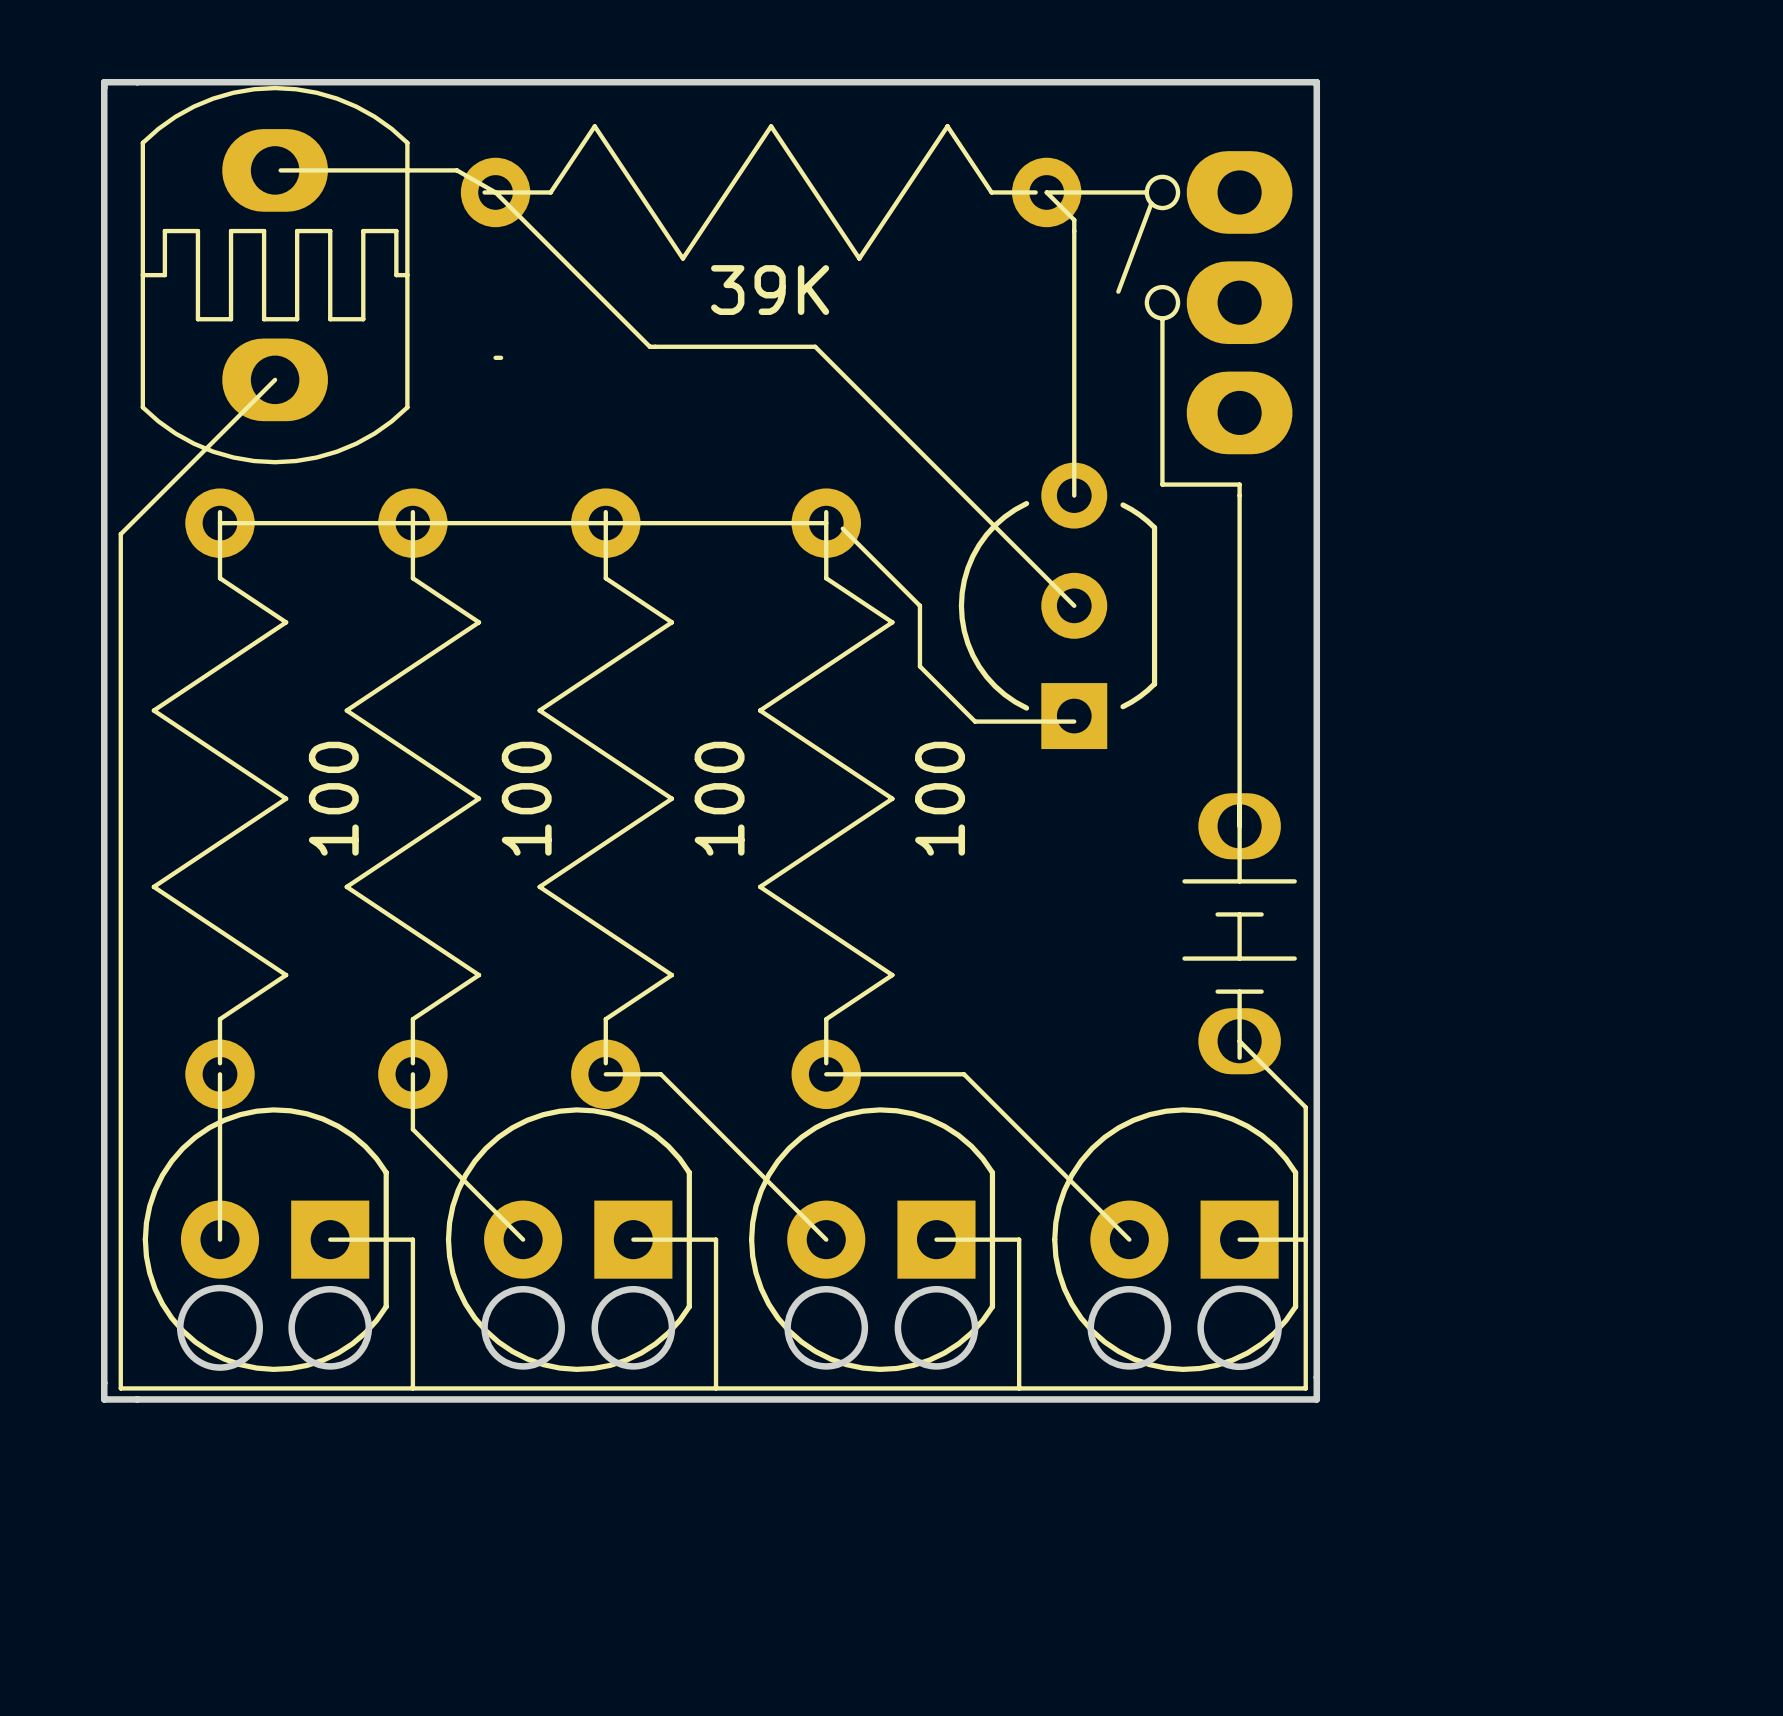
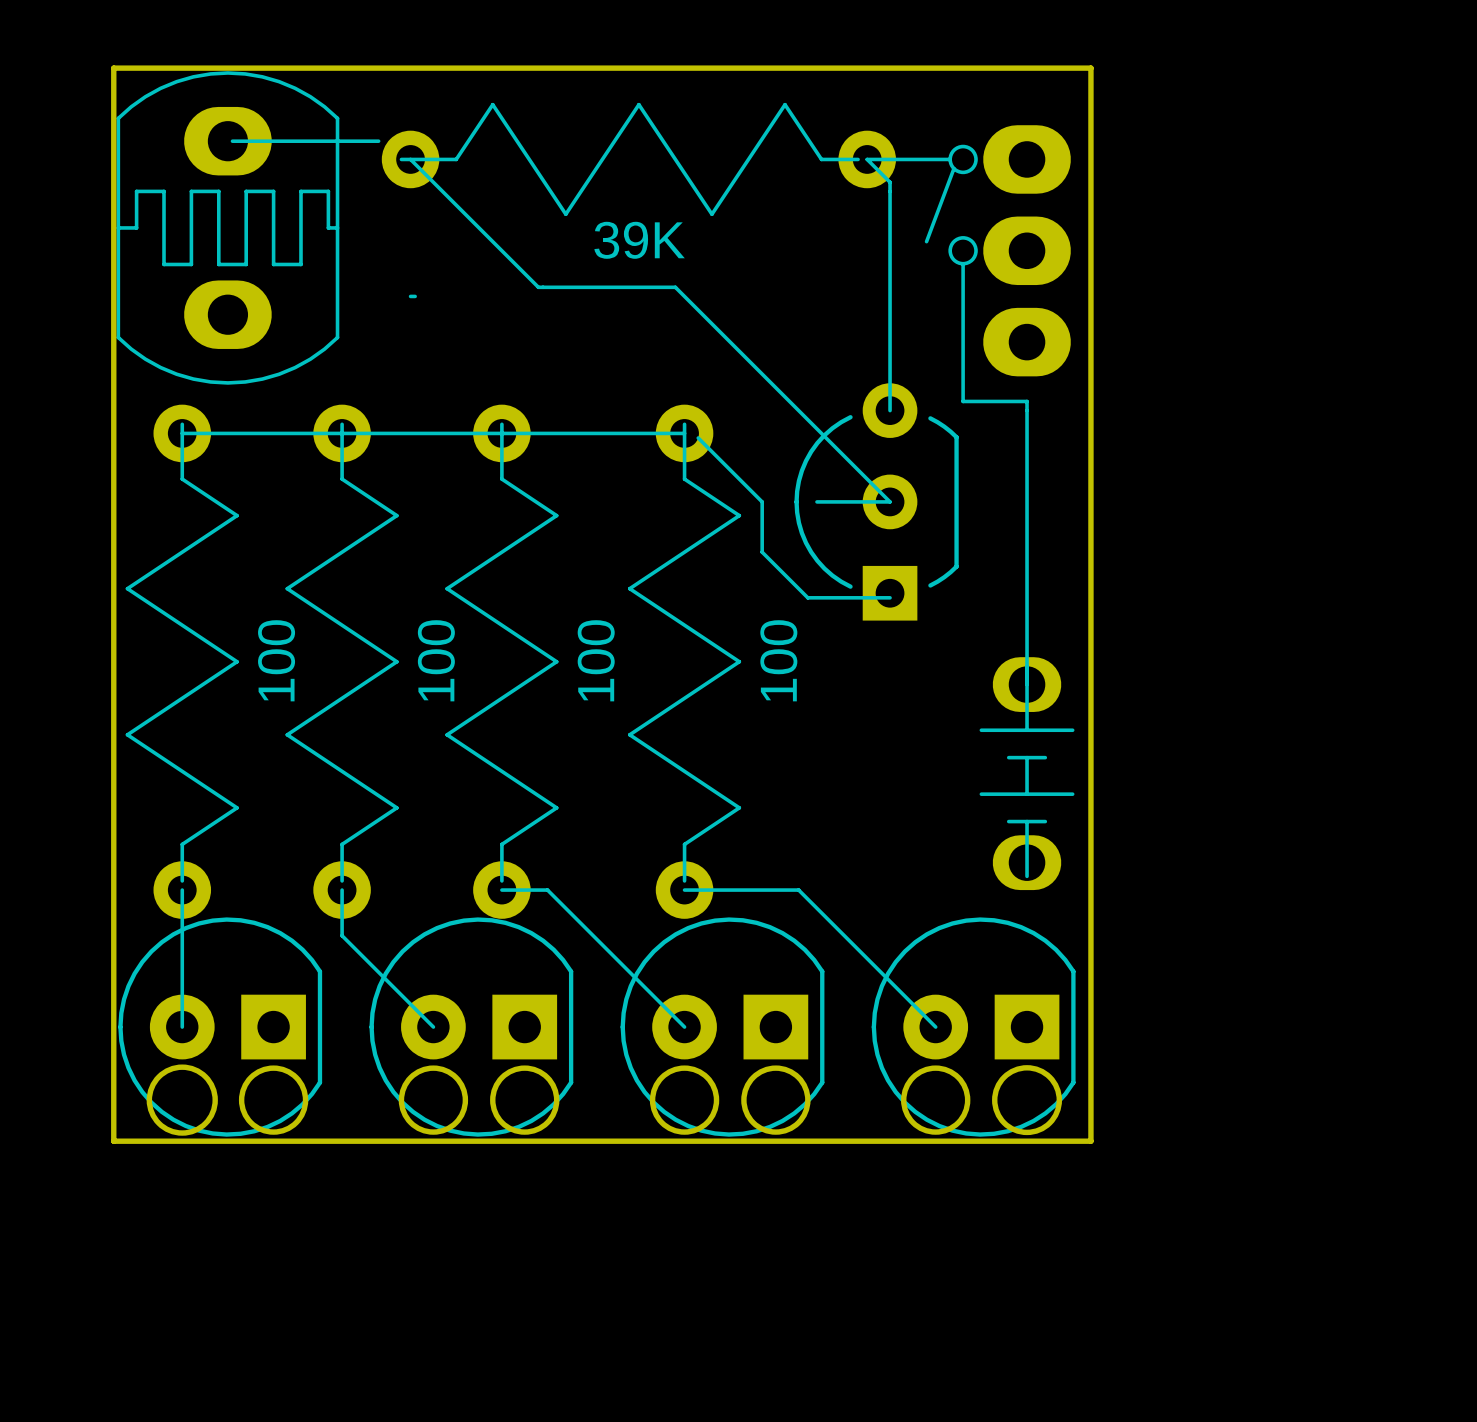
board edge: (137, 82) (104, 82) (104, 1399) (1316, 1399) (1316, 1377) -> (113, 68) (113, 1141) (1090, 1141)
line: (456, 170) (495, 192) -> none
line: (275, 379) (120, 534) (120, 1388) (1305, 1388) (1305, 1107) (1239, 1041) -> none
line: none -> (816, 501) (890, 501)
line: (330, 1239) (412, 1239) (412, 1388) -> none
line: (633, 1239) (716, 1239) (716, 1388) -> none
line: (936, 1239) (1019, 1239) (1019, 1388) -> none
line: (1239, 1239) (1305, 1239) -> none

